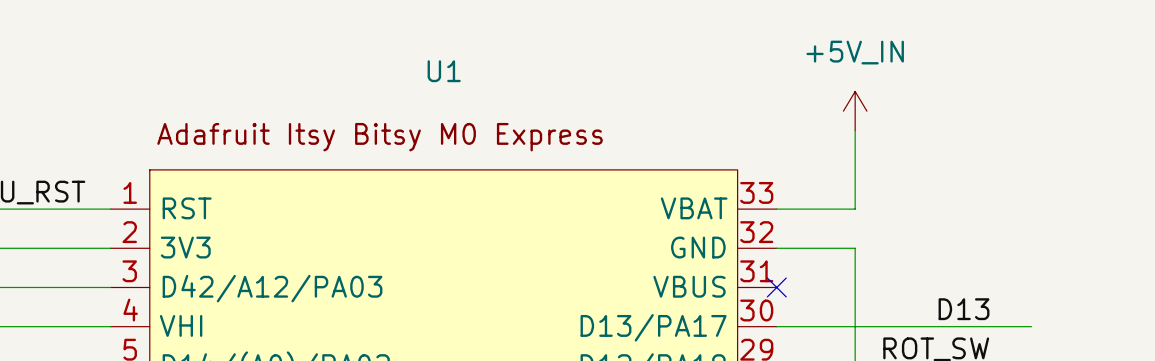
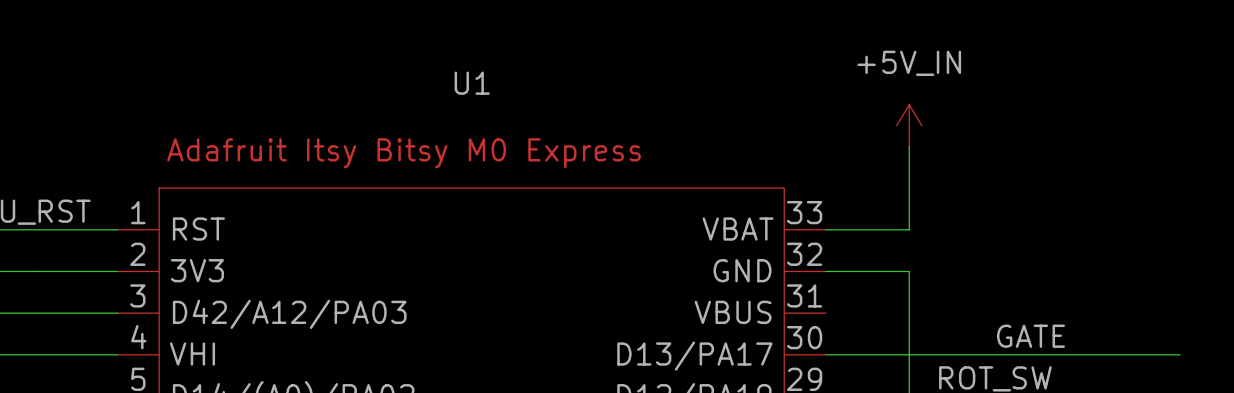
no-connect mark: (776, 287) -> none
label: D13 (964, 309) -> GATE (1030, 336)
wire: none -> (1096, 354) (1180, 354)

